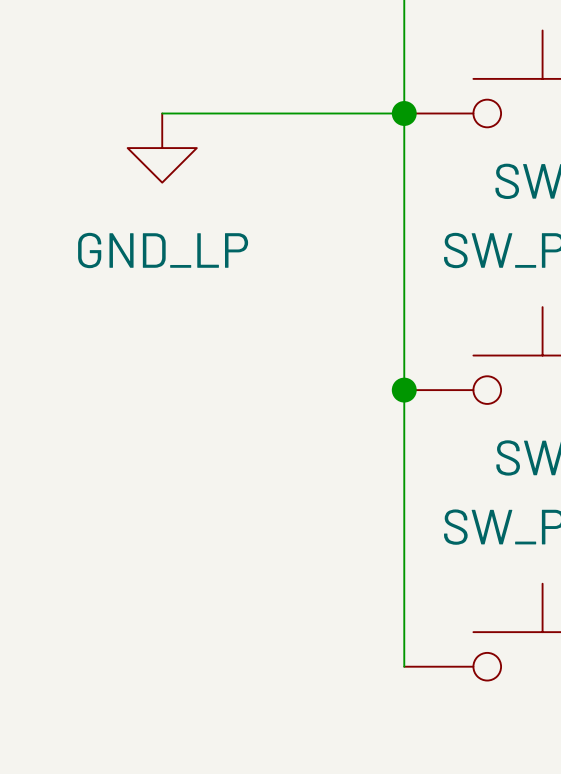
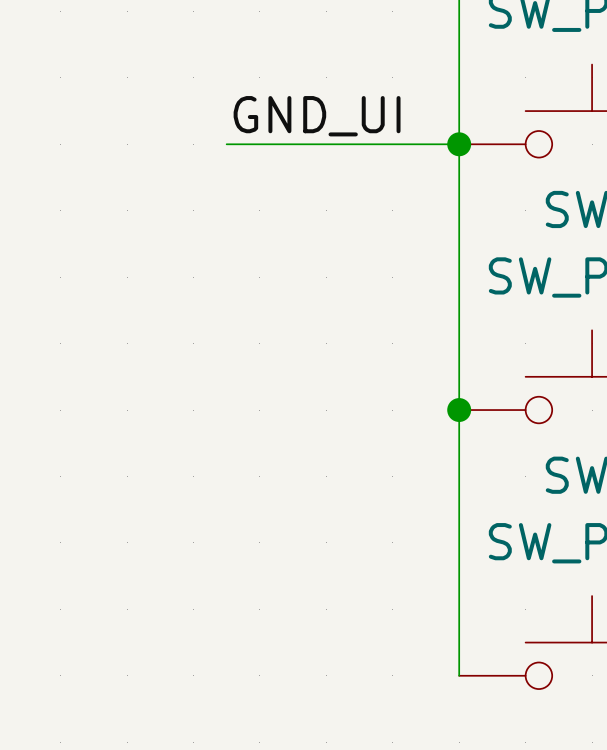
label: none -> GND_UI (317, 116)
power symbol: GND_LP (162, 148) -> none

